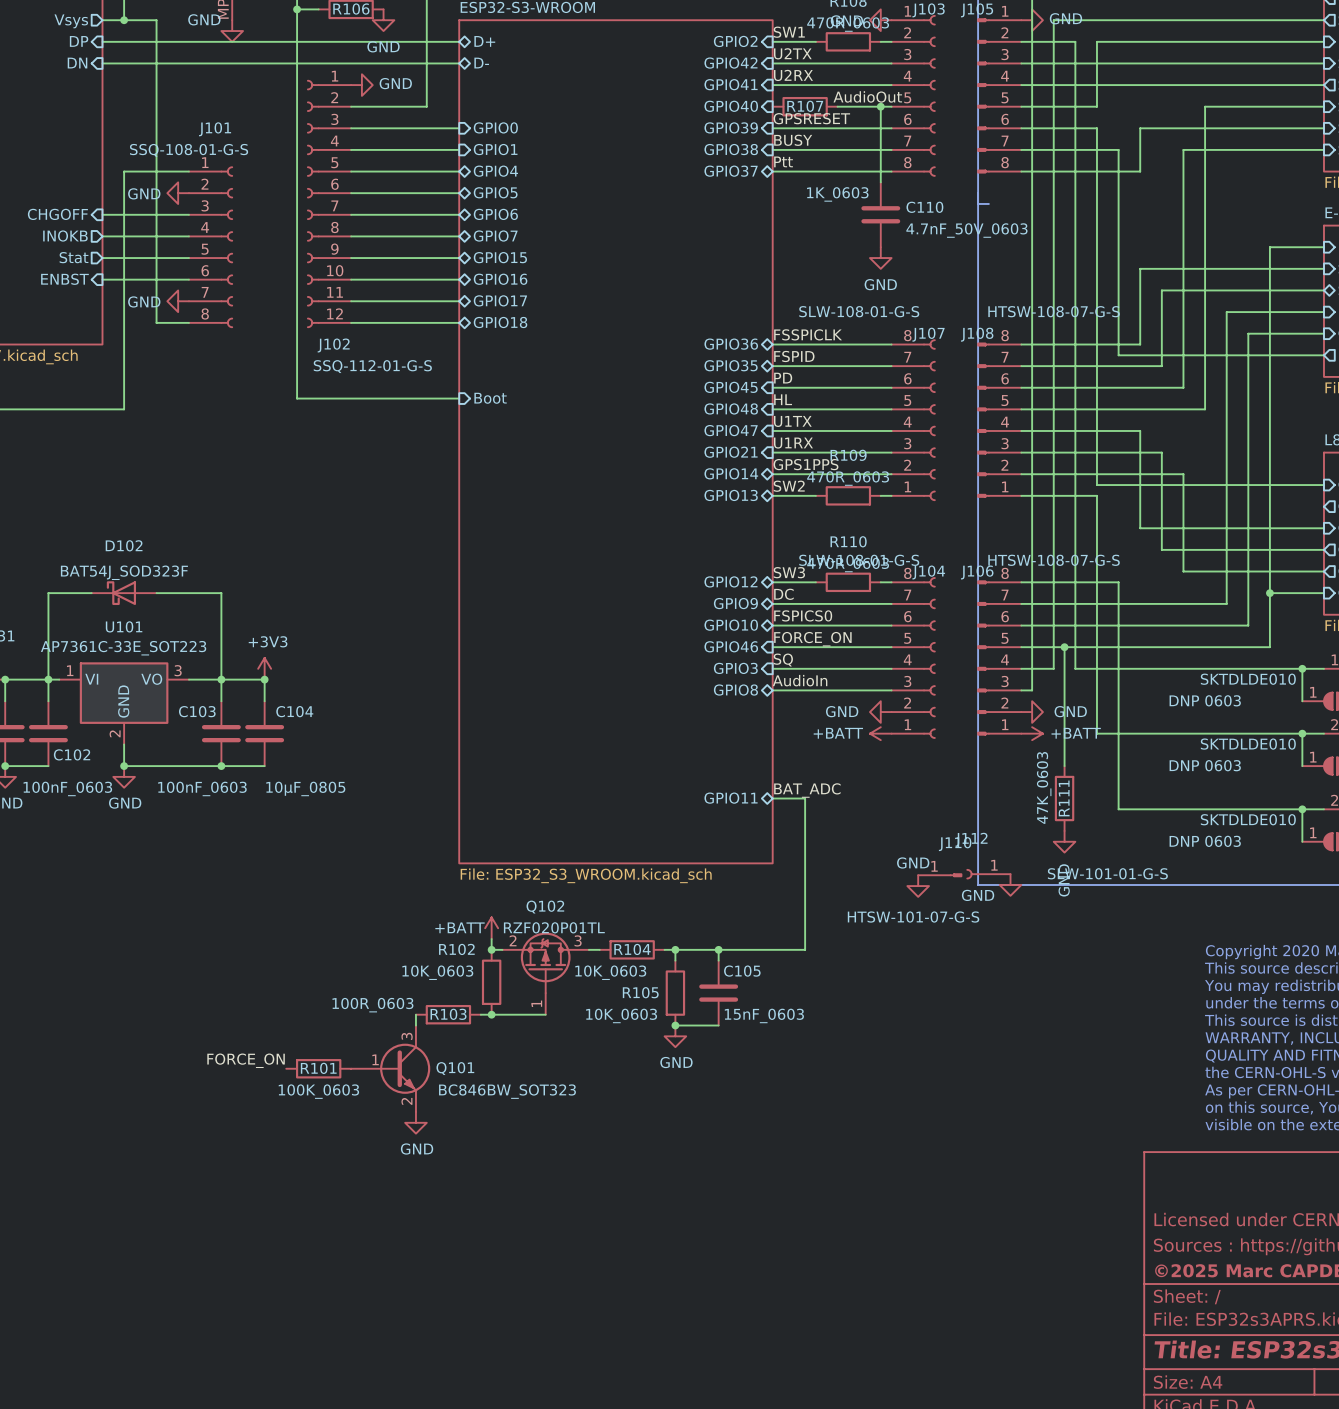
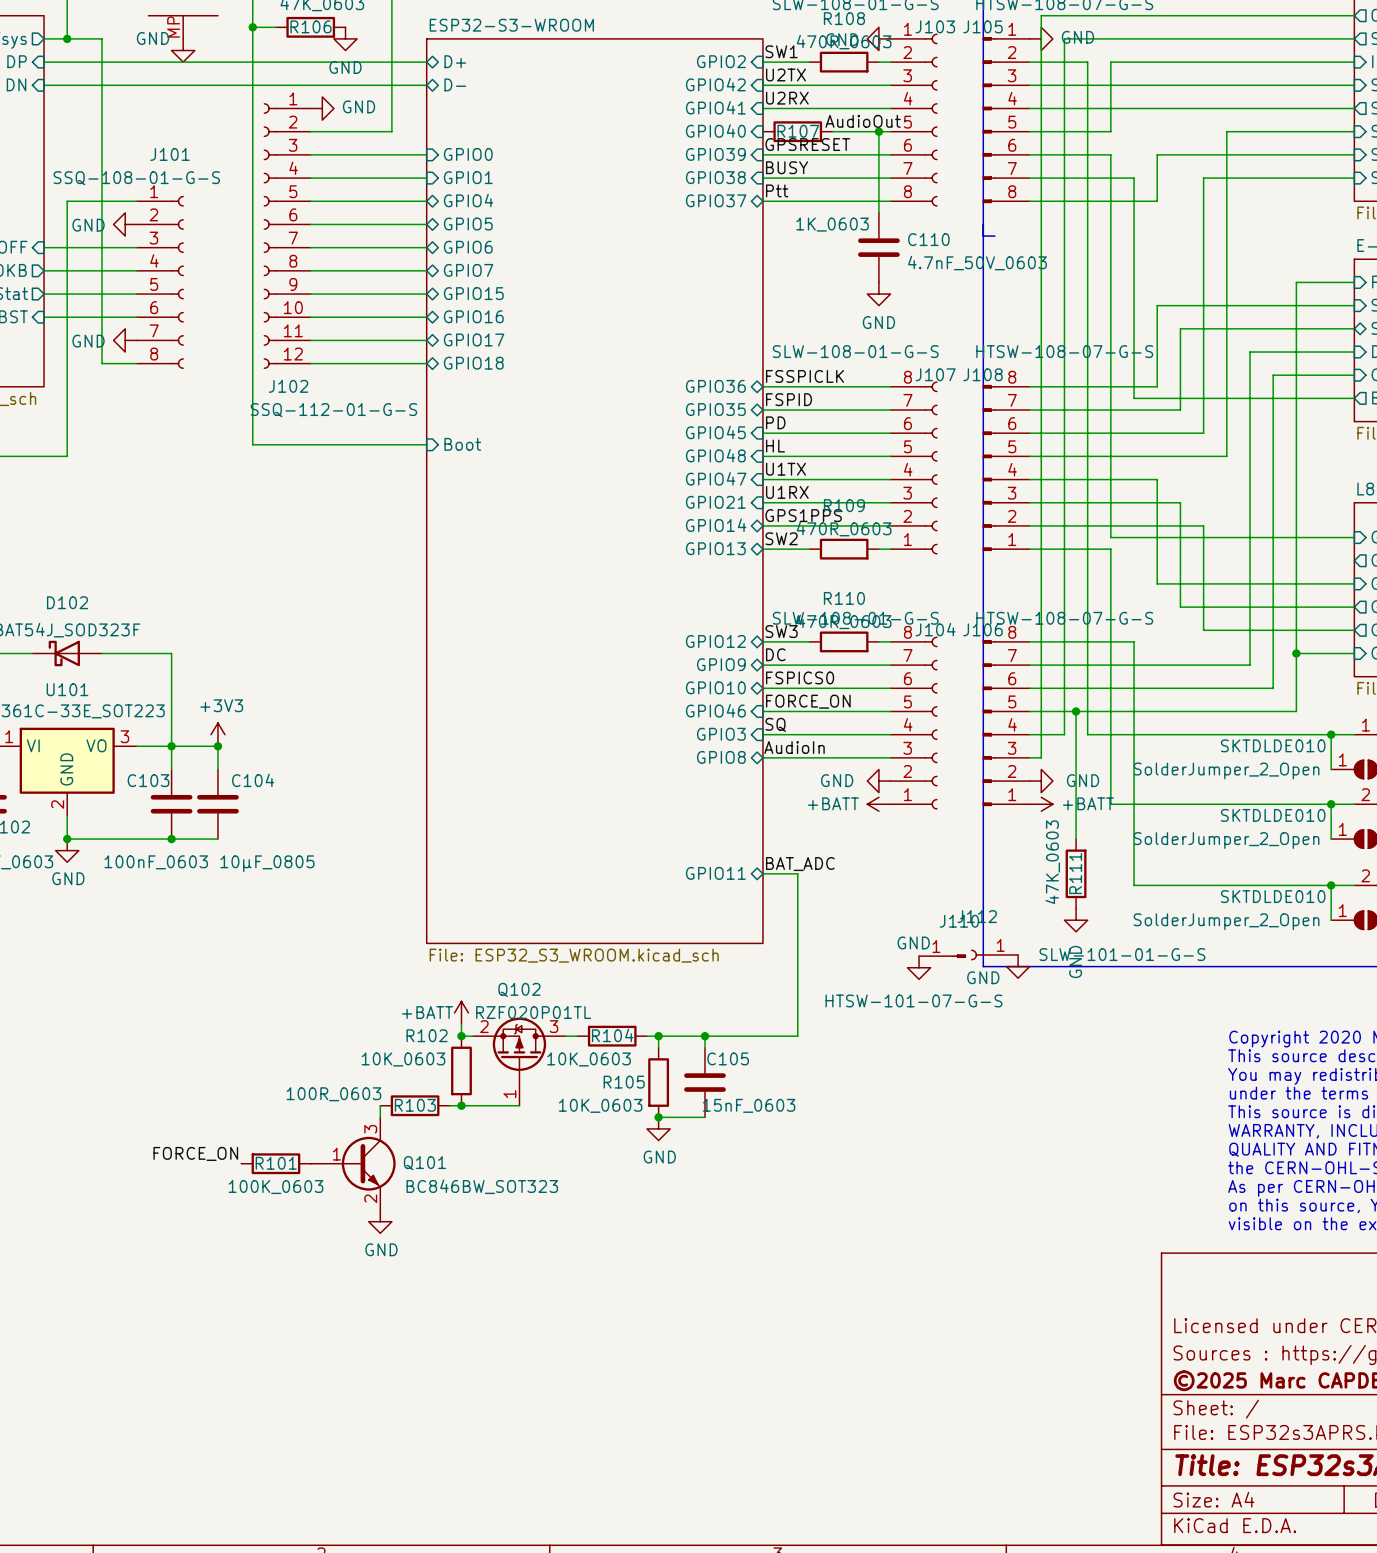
part value: DNP 0603 (1205, 700) -> SolderJumper_2_Open (1226, 770)
part value: DNP 0603 (1205, 765) -> SolderJumper_2_Open (1226, 840)
part value: DNP 0603 (1205, 841) -> SolderJumper_2_Open (1226, 921)

